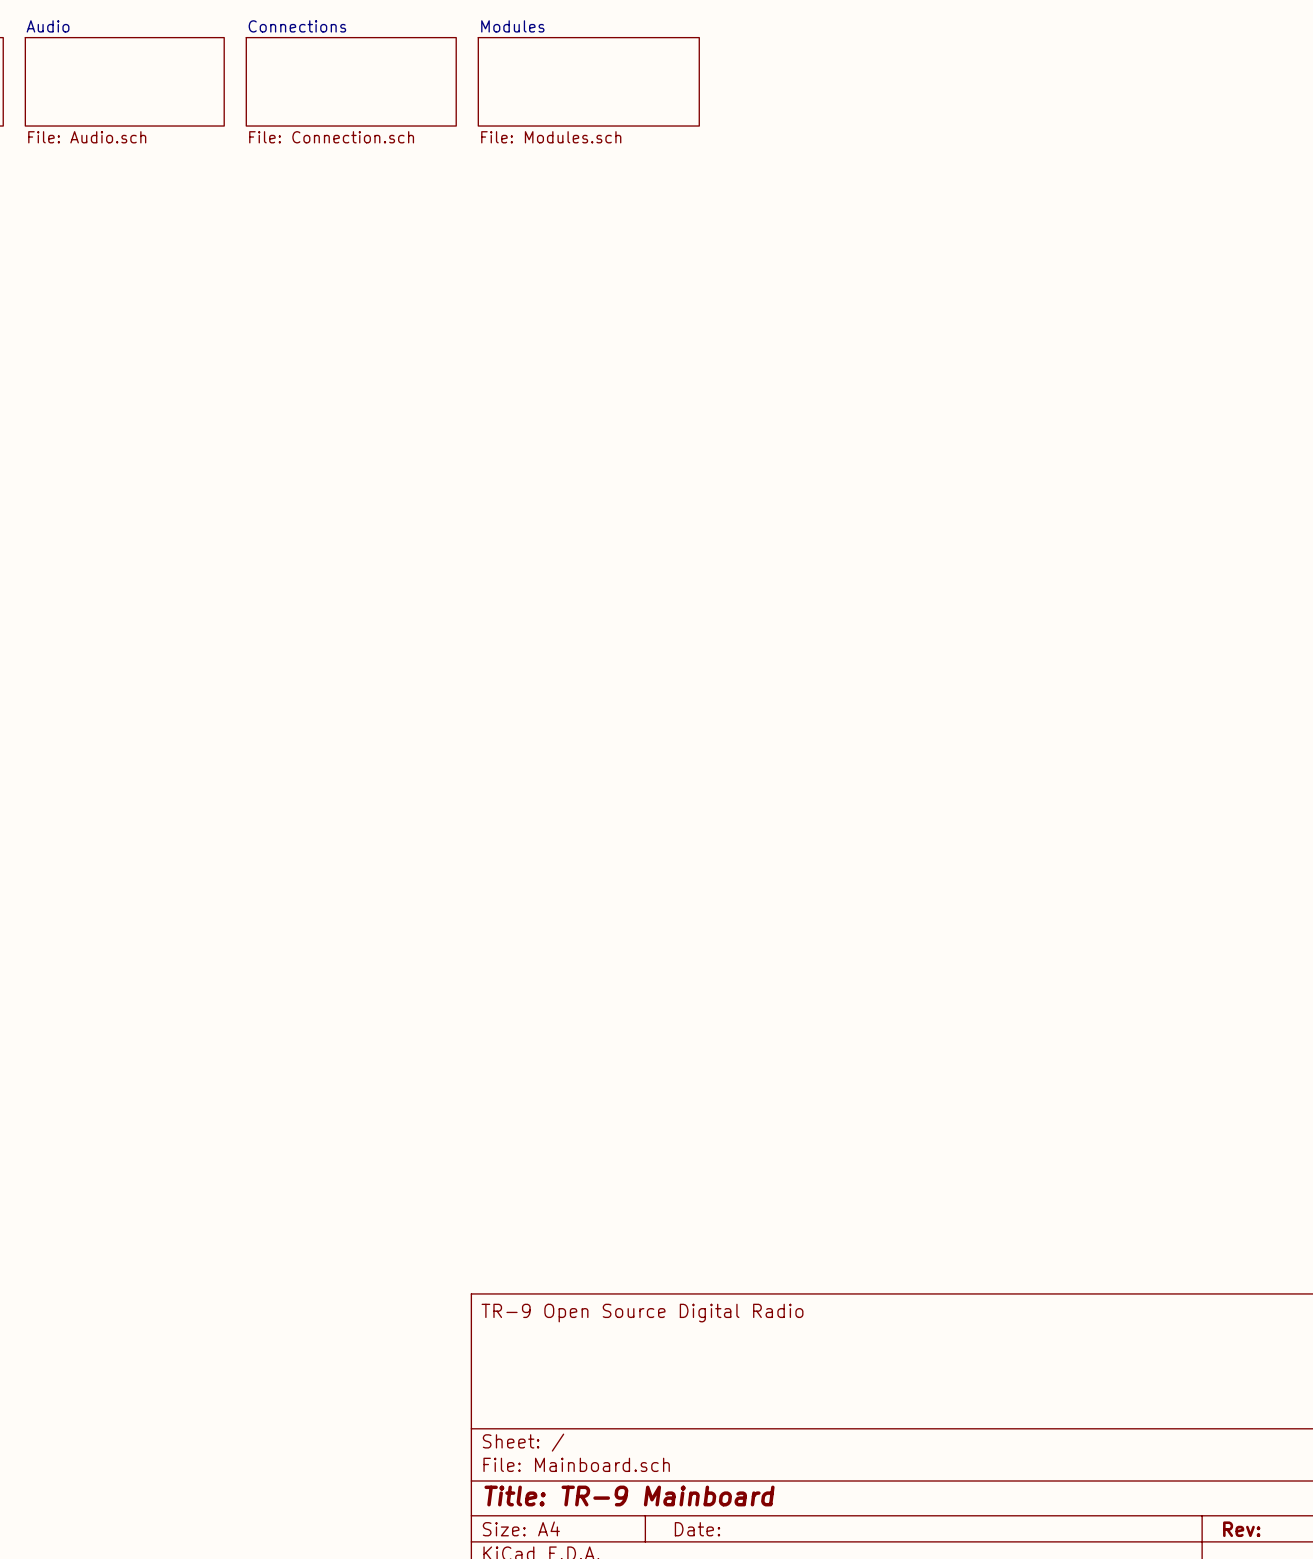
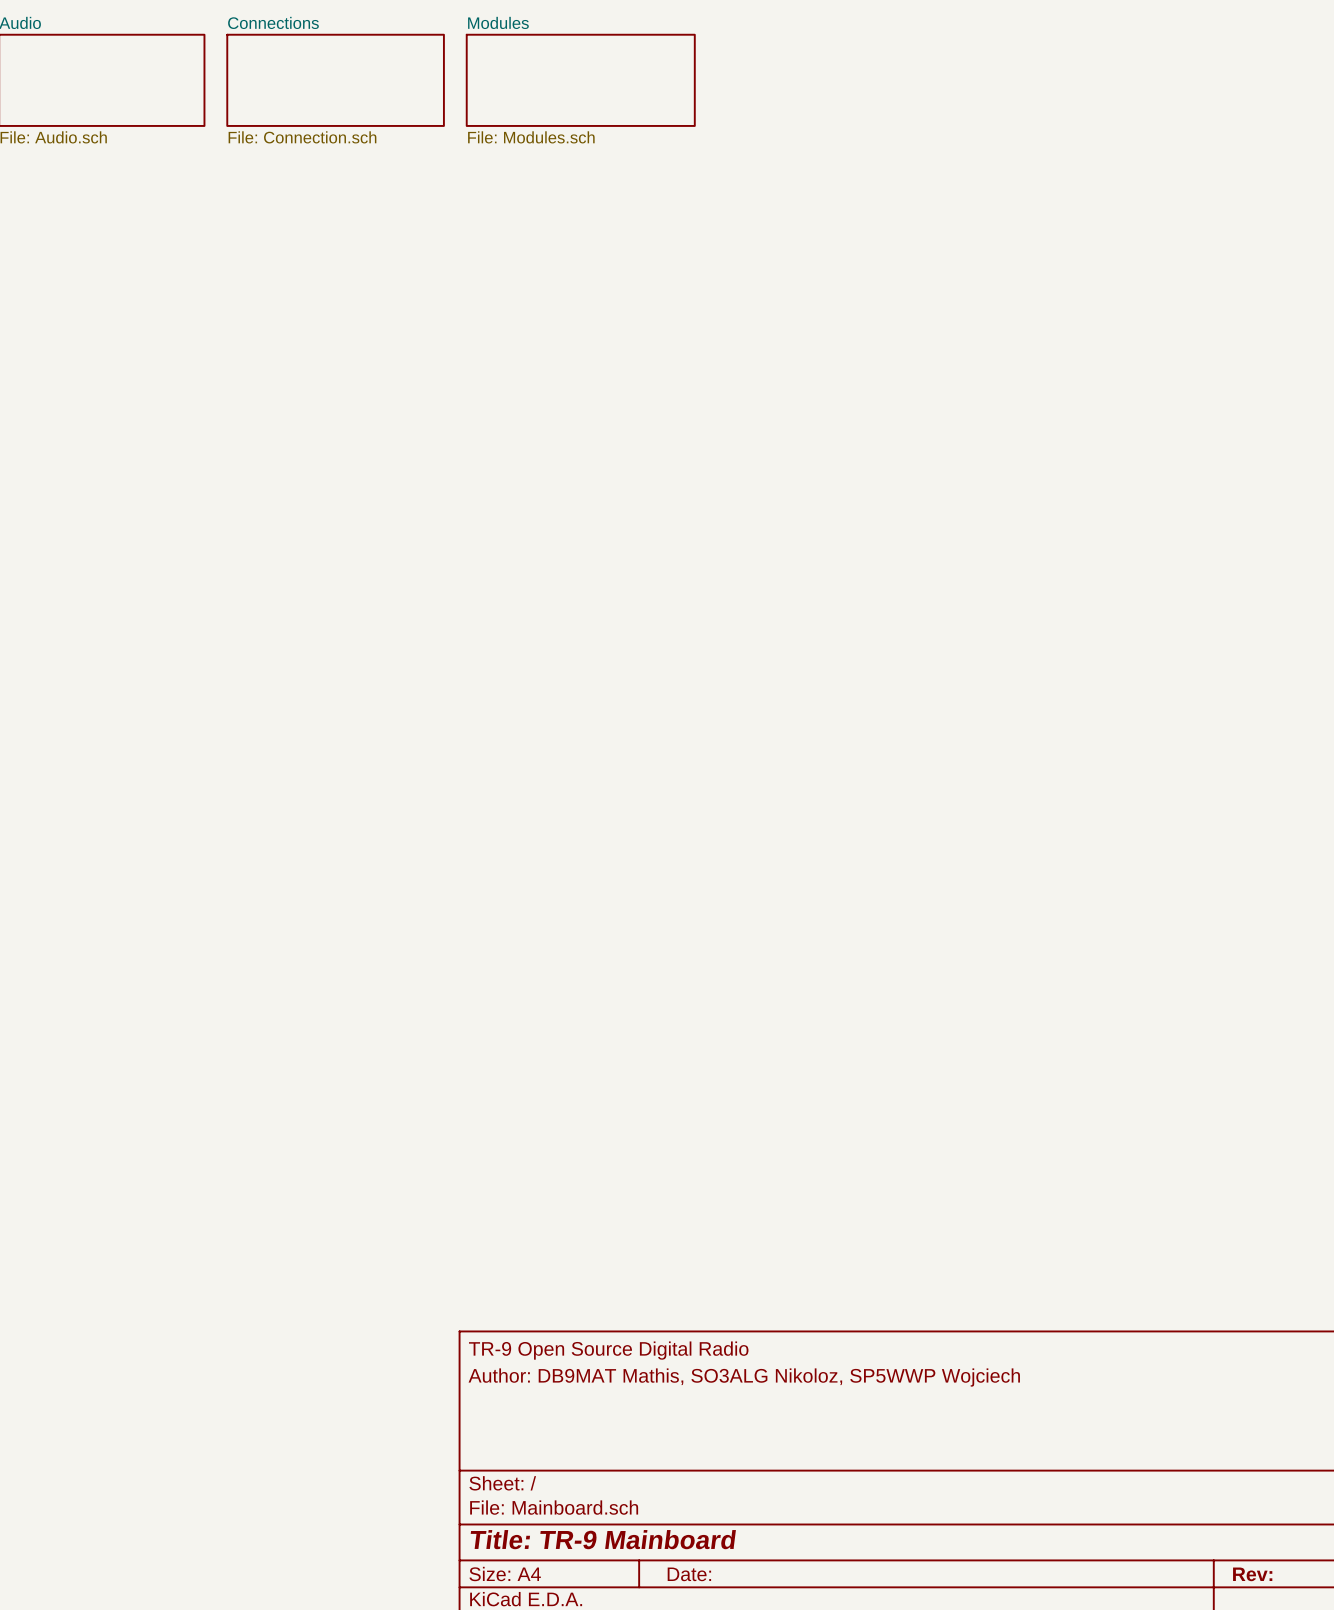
title block: none -> Author: DB9MAT Mathis, SO3ALG Nikoloz, SP5WWP Wojciech (744, 1377)

